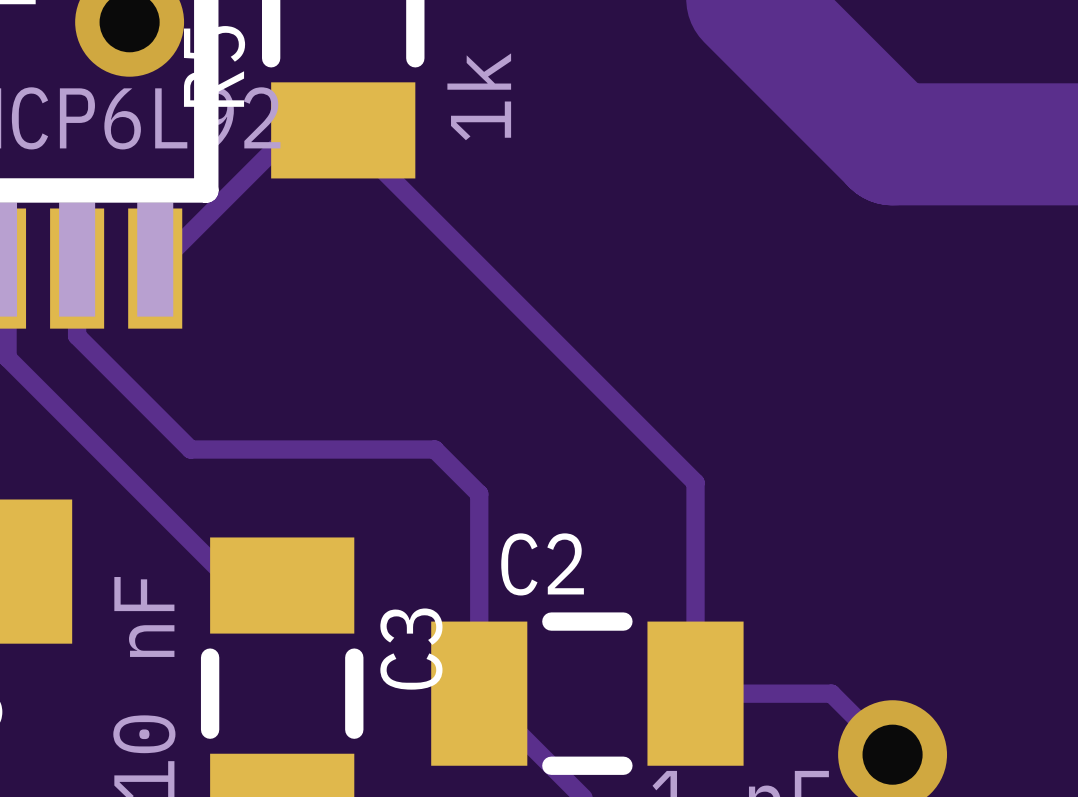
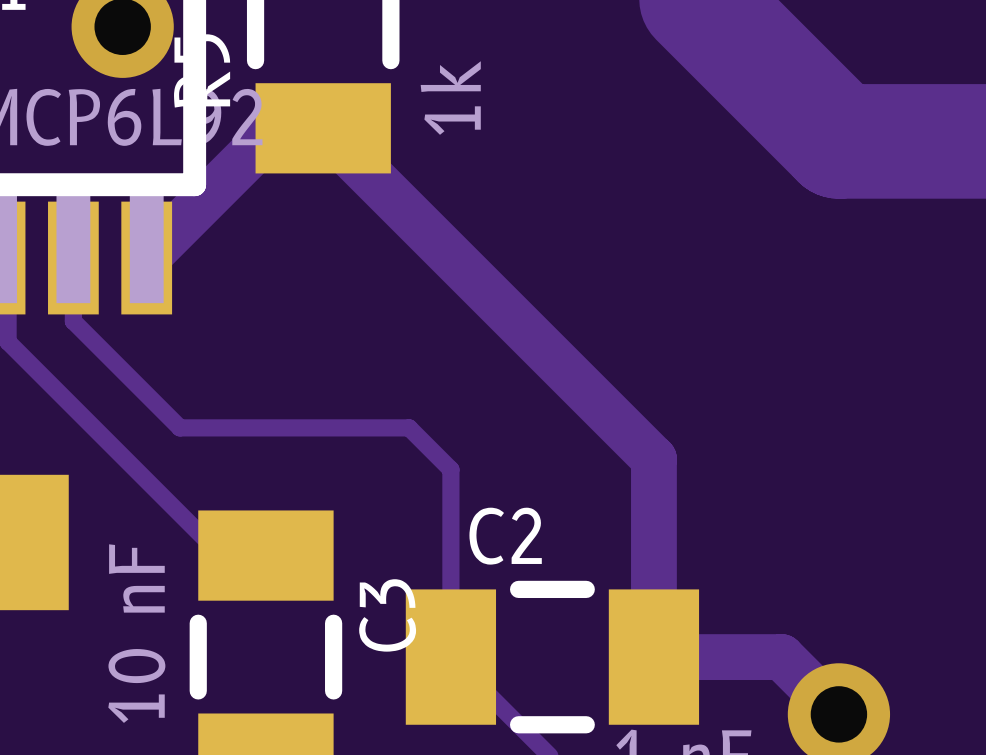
track width: thin (293, 130) (155, 268) -> thick (276, 128) (146, 258)
track width: thin (343, 130) (695, 482) (695, 693) (831, 693) (892, 754) -> thick (323, 128) (653, 459) (653, 657) (781, 657) (838, 714)

